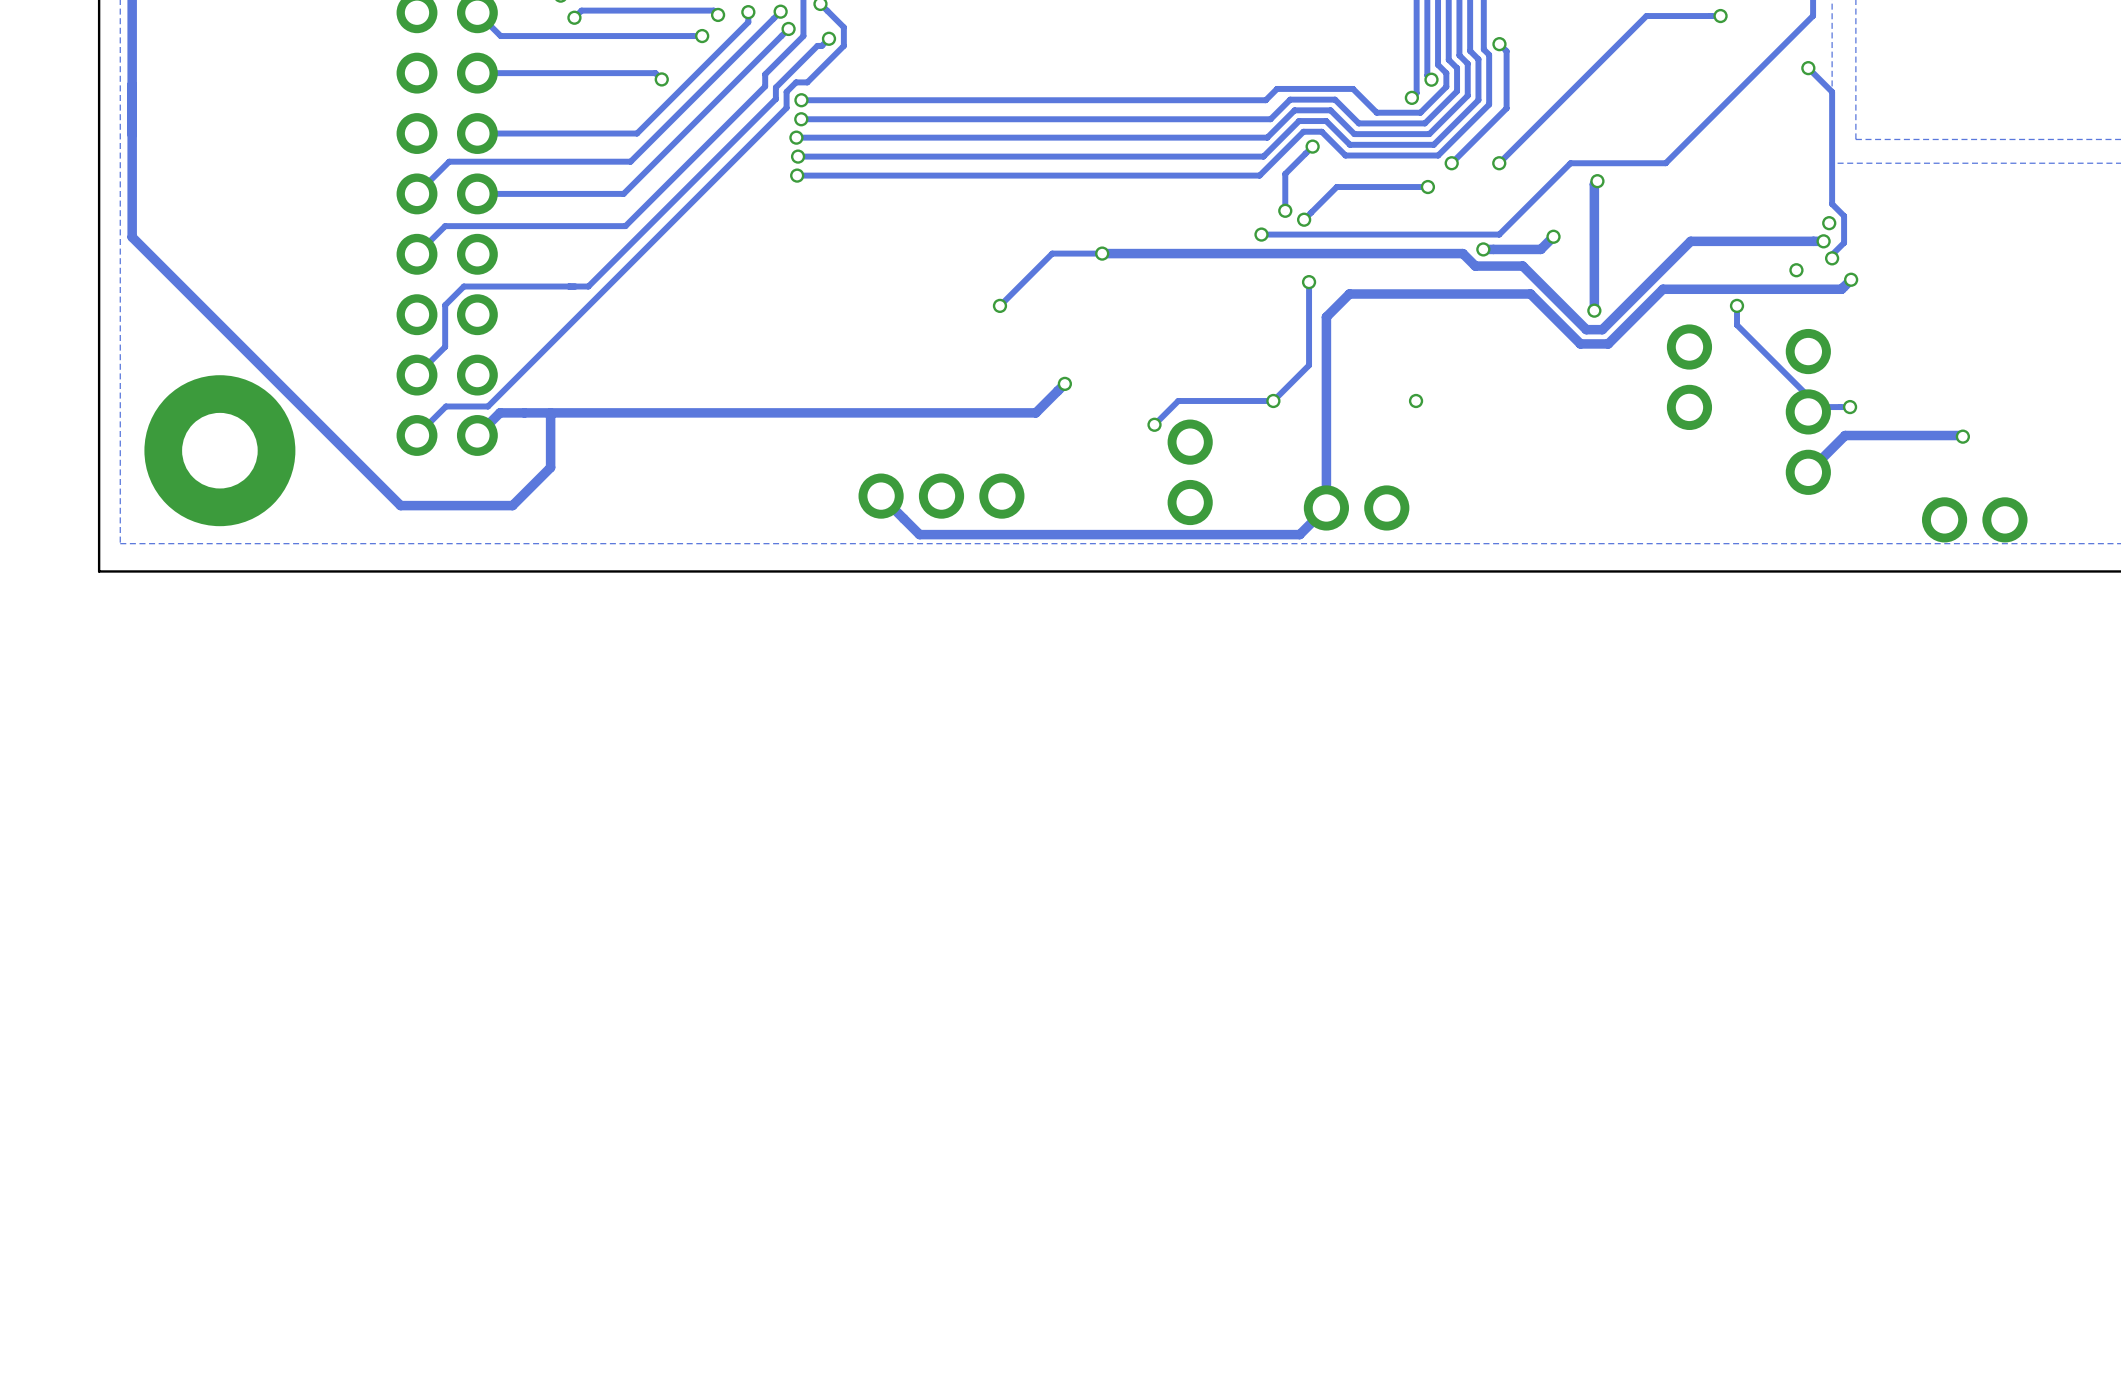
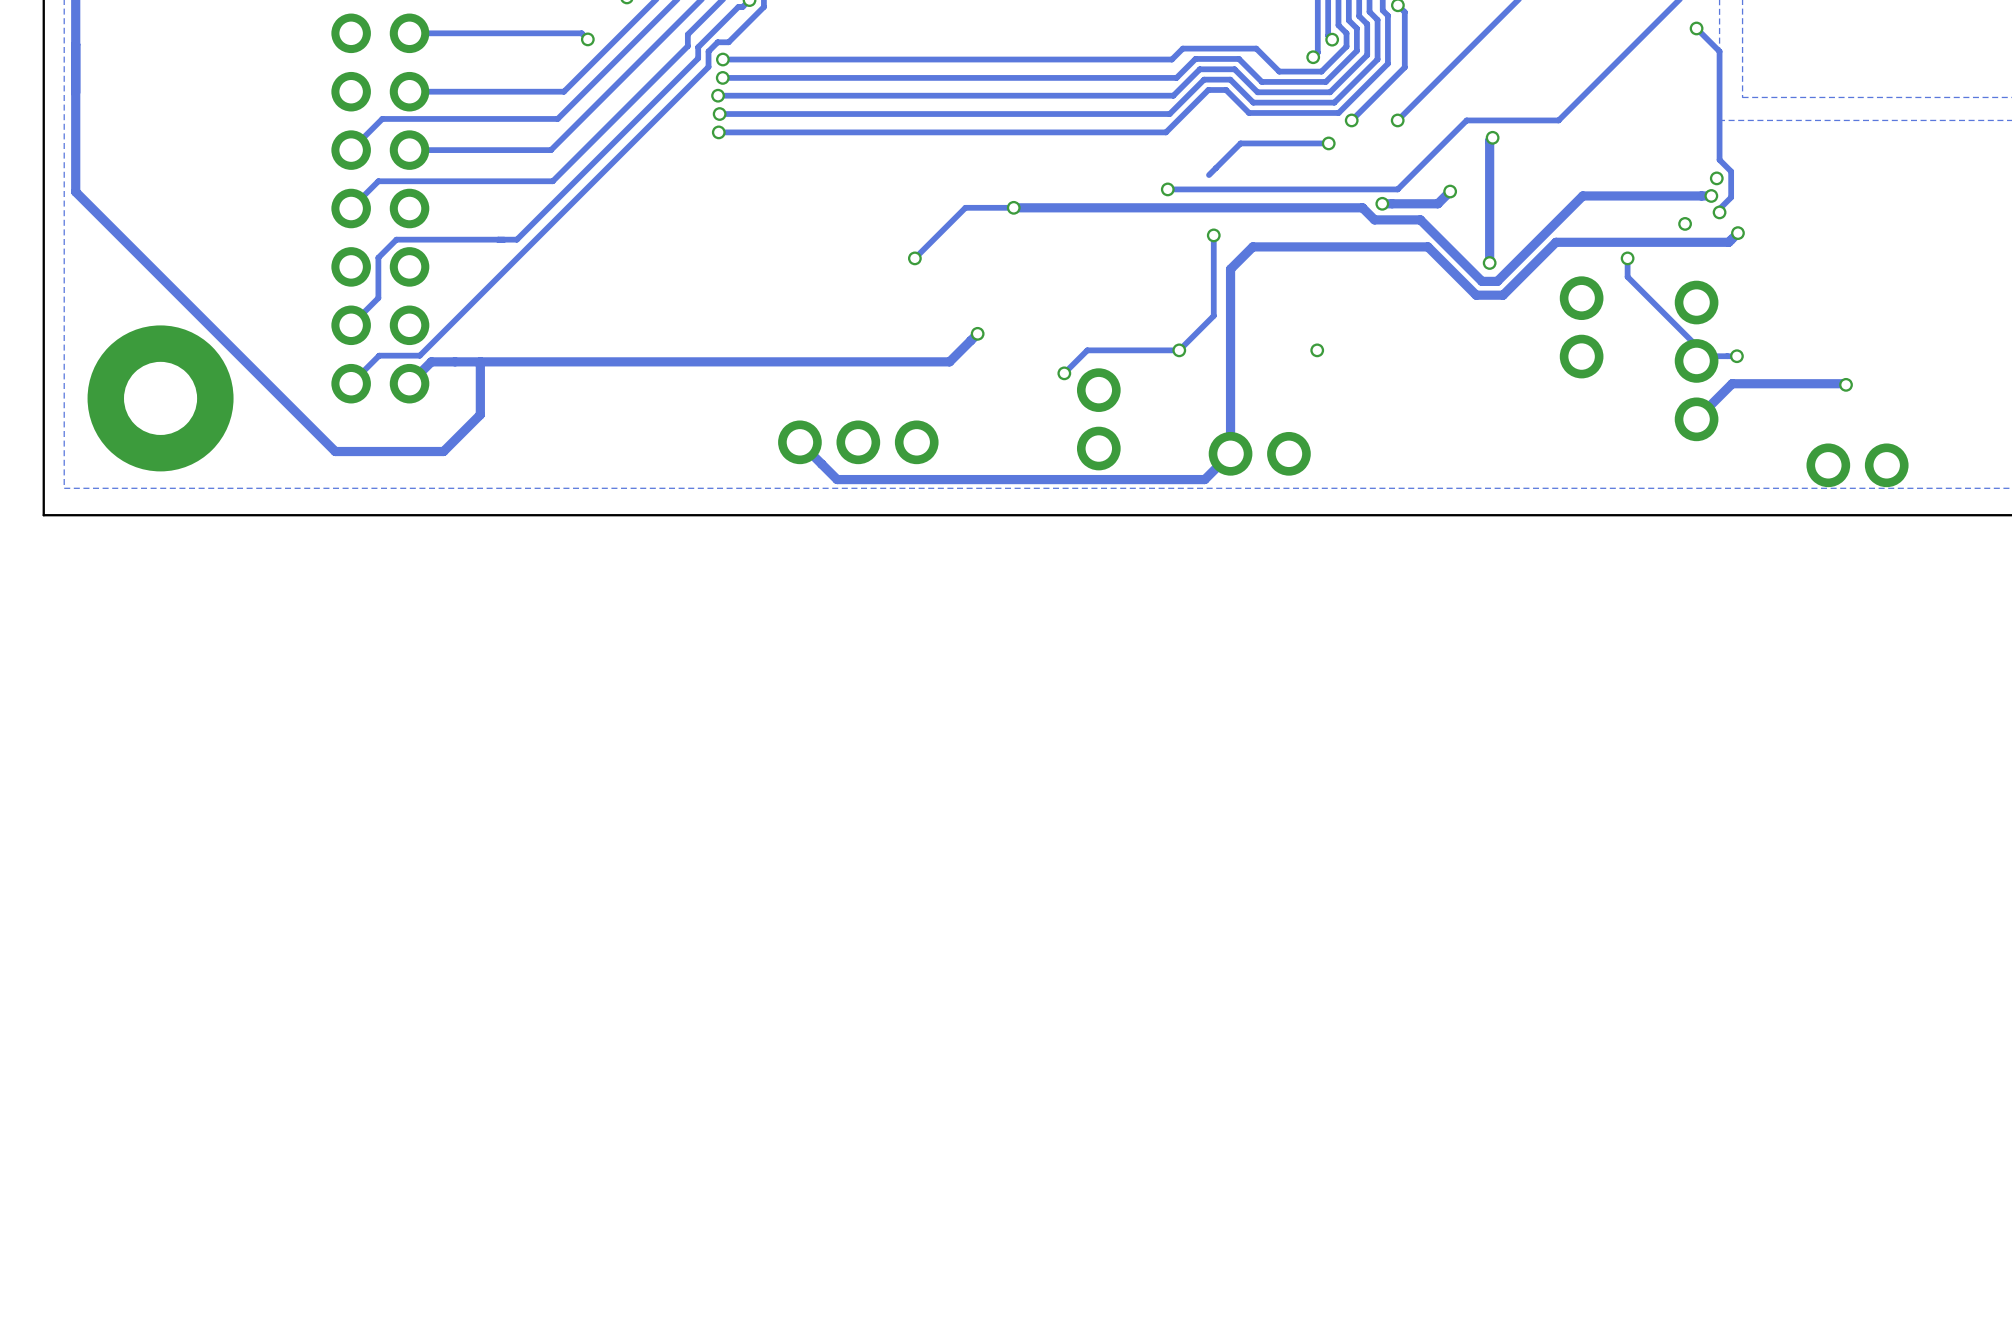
track: (1312, 146) (1285, 173) (1285, 210) -> none
via: (1312, 146) -> none
via: (1285, 210) -> none
via: (1304, 219) -> none

